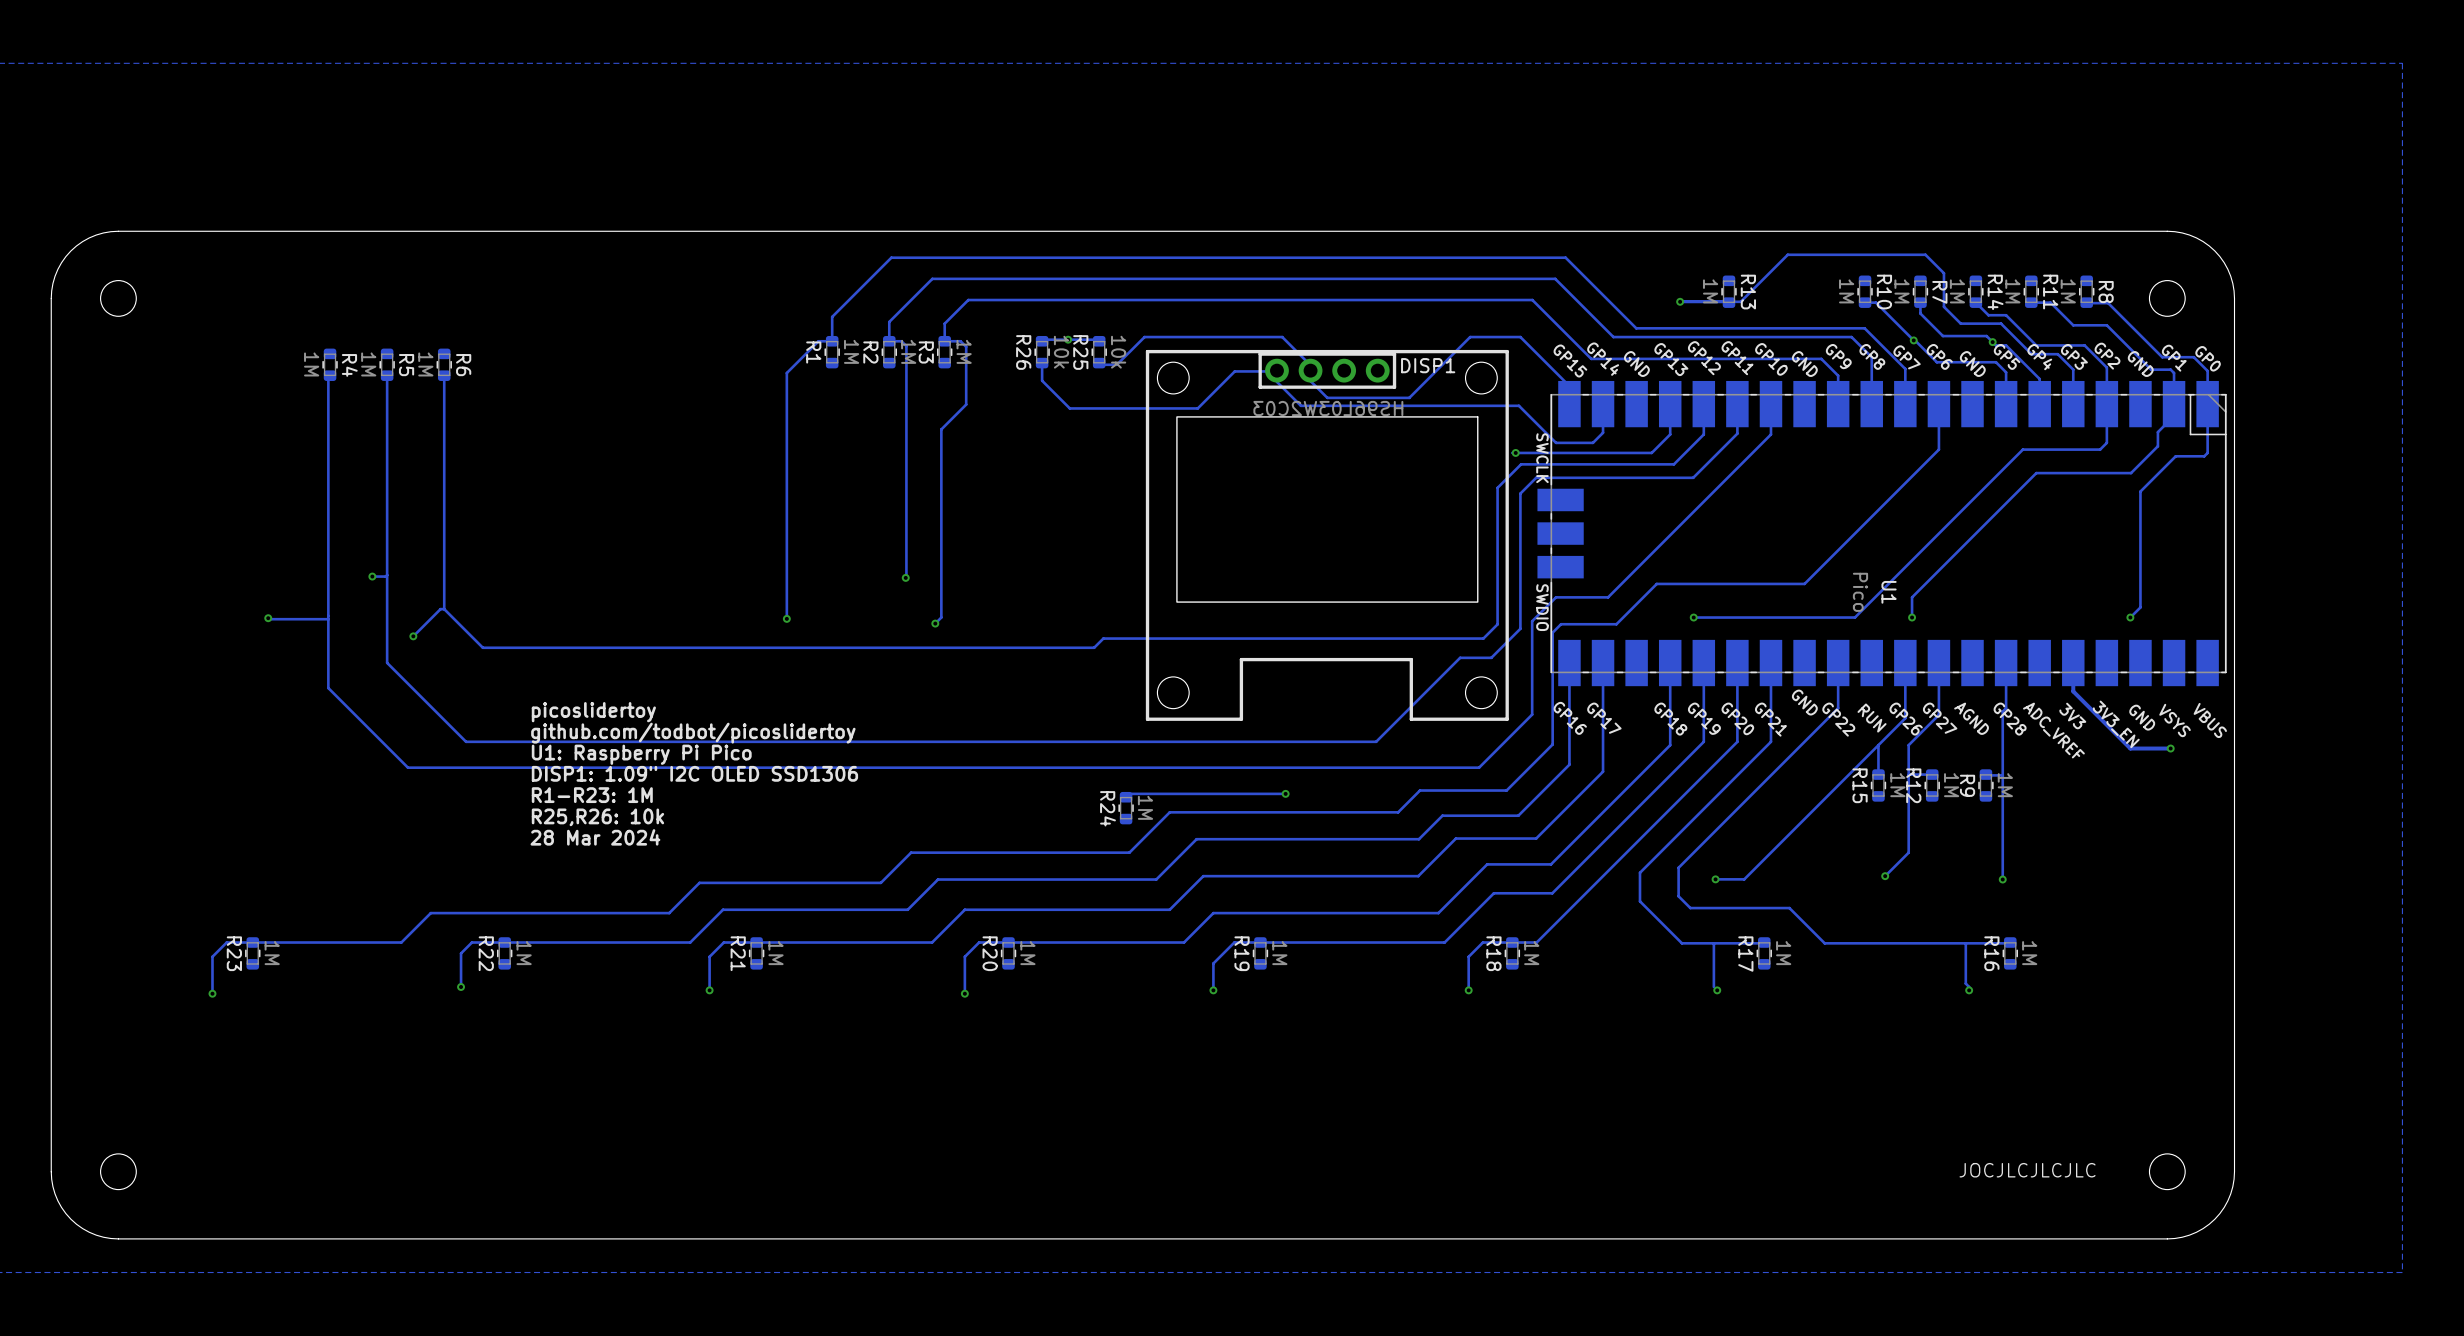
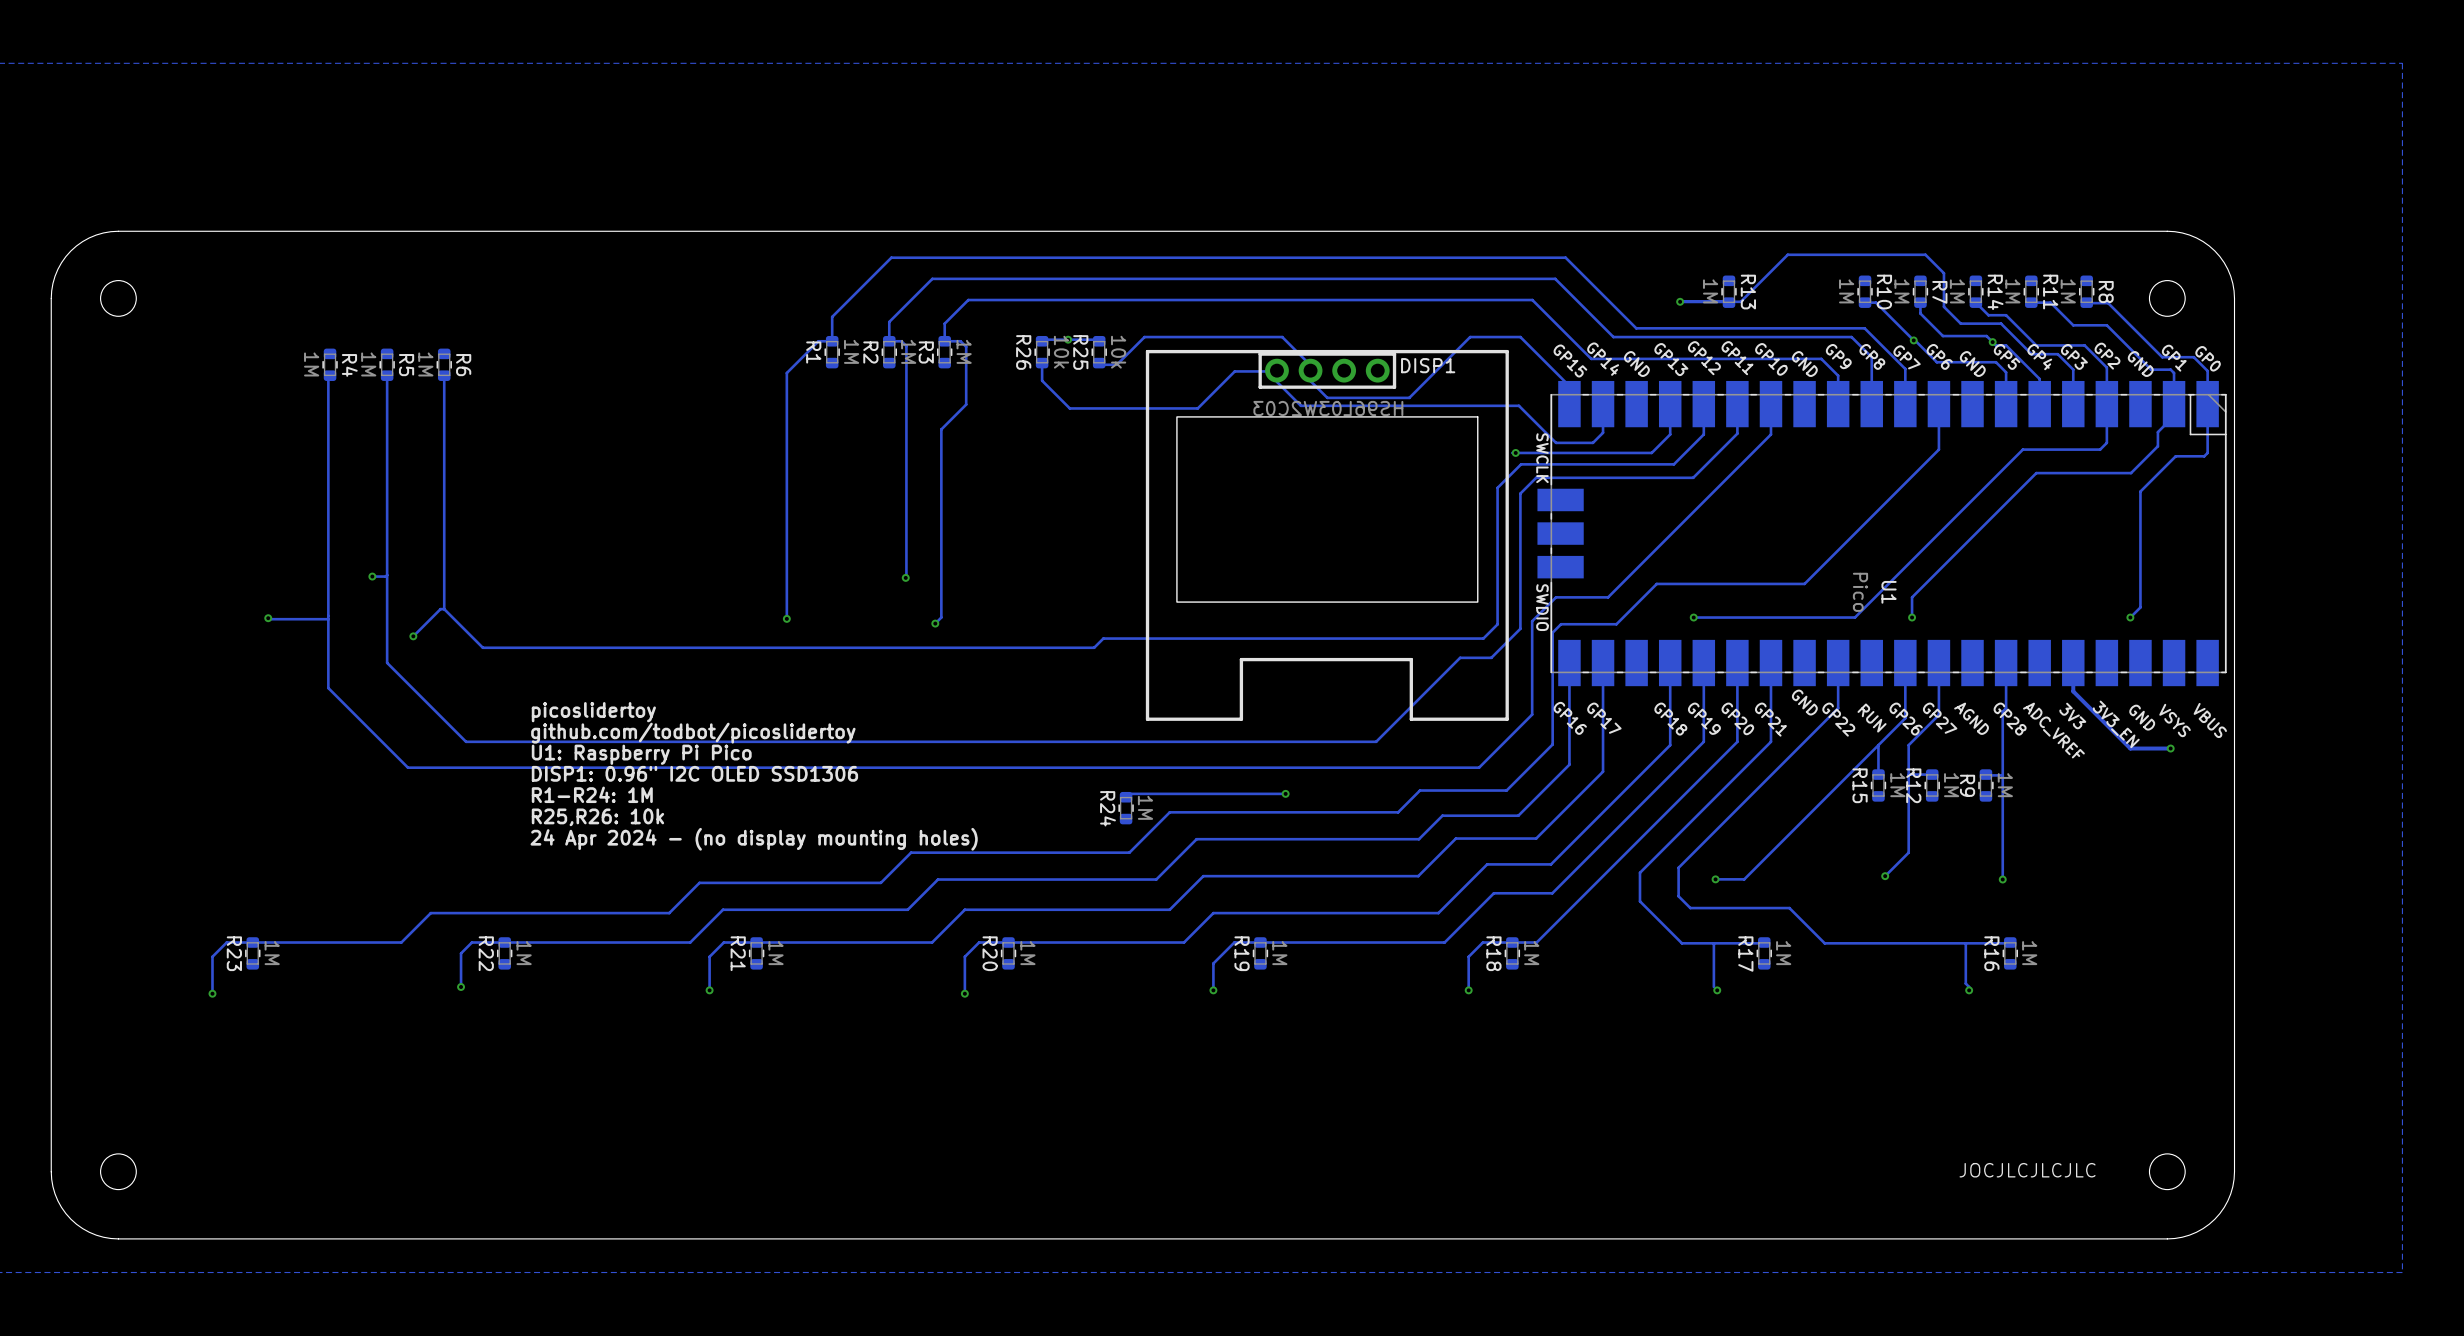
DISP1 footprint: [1145, 349, 1509, 721] -> [1145, 349, 1509, 721]
text: DISP1: 1.09" I2C OLED SSD1306 (694, 773) -> DISP1: 0.96" I2C OLED SSD1306 (694, 773)
text: R1-R23: 1M (592, 795) -> R1-R24: 1M (592, 794)
text: 28 Mar 2024 (595, 837) -> 24 Apr 2024 - (no display mounting holes) (754, 839)

